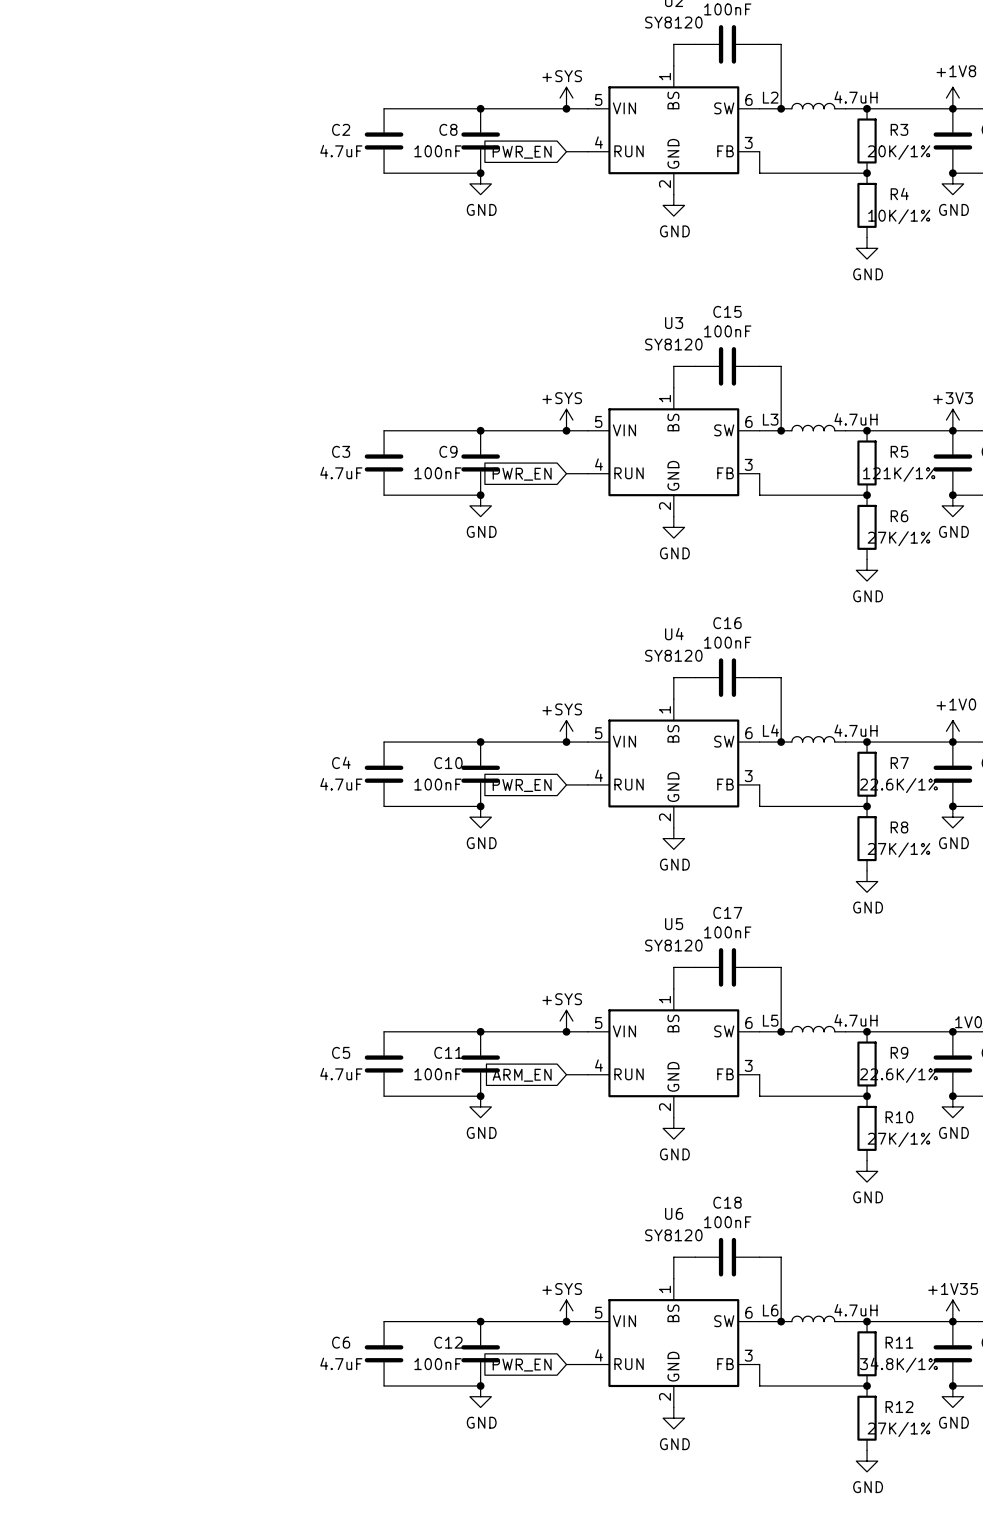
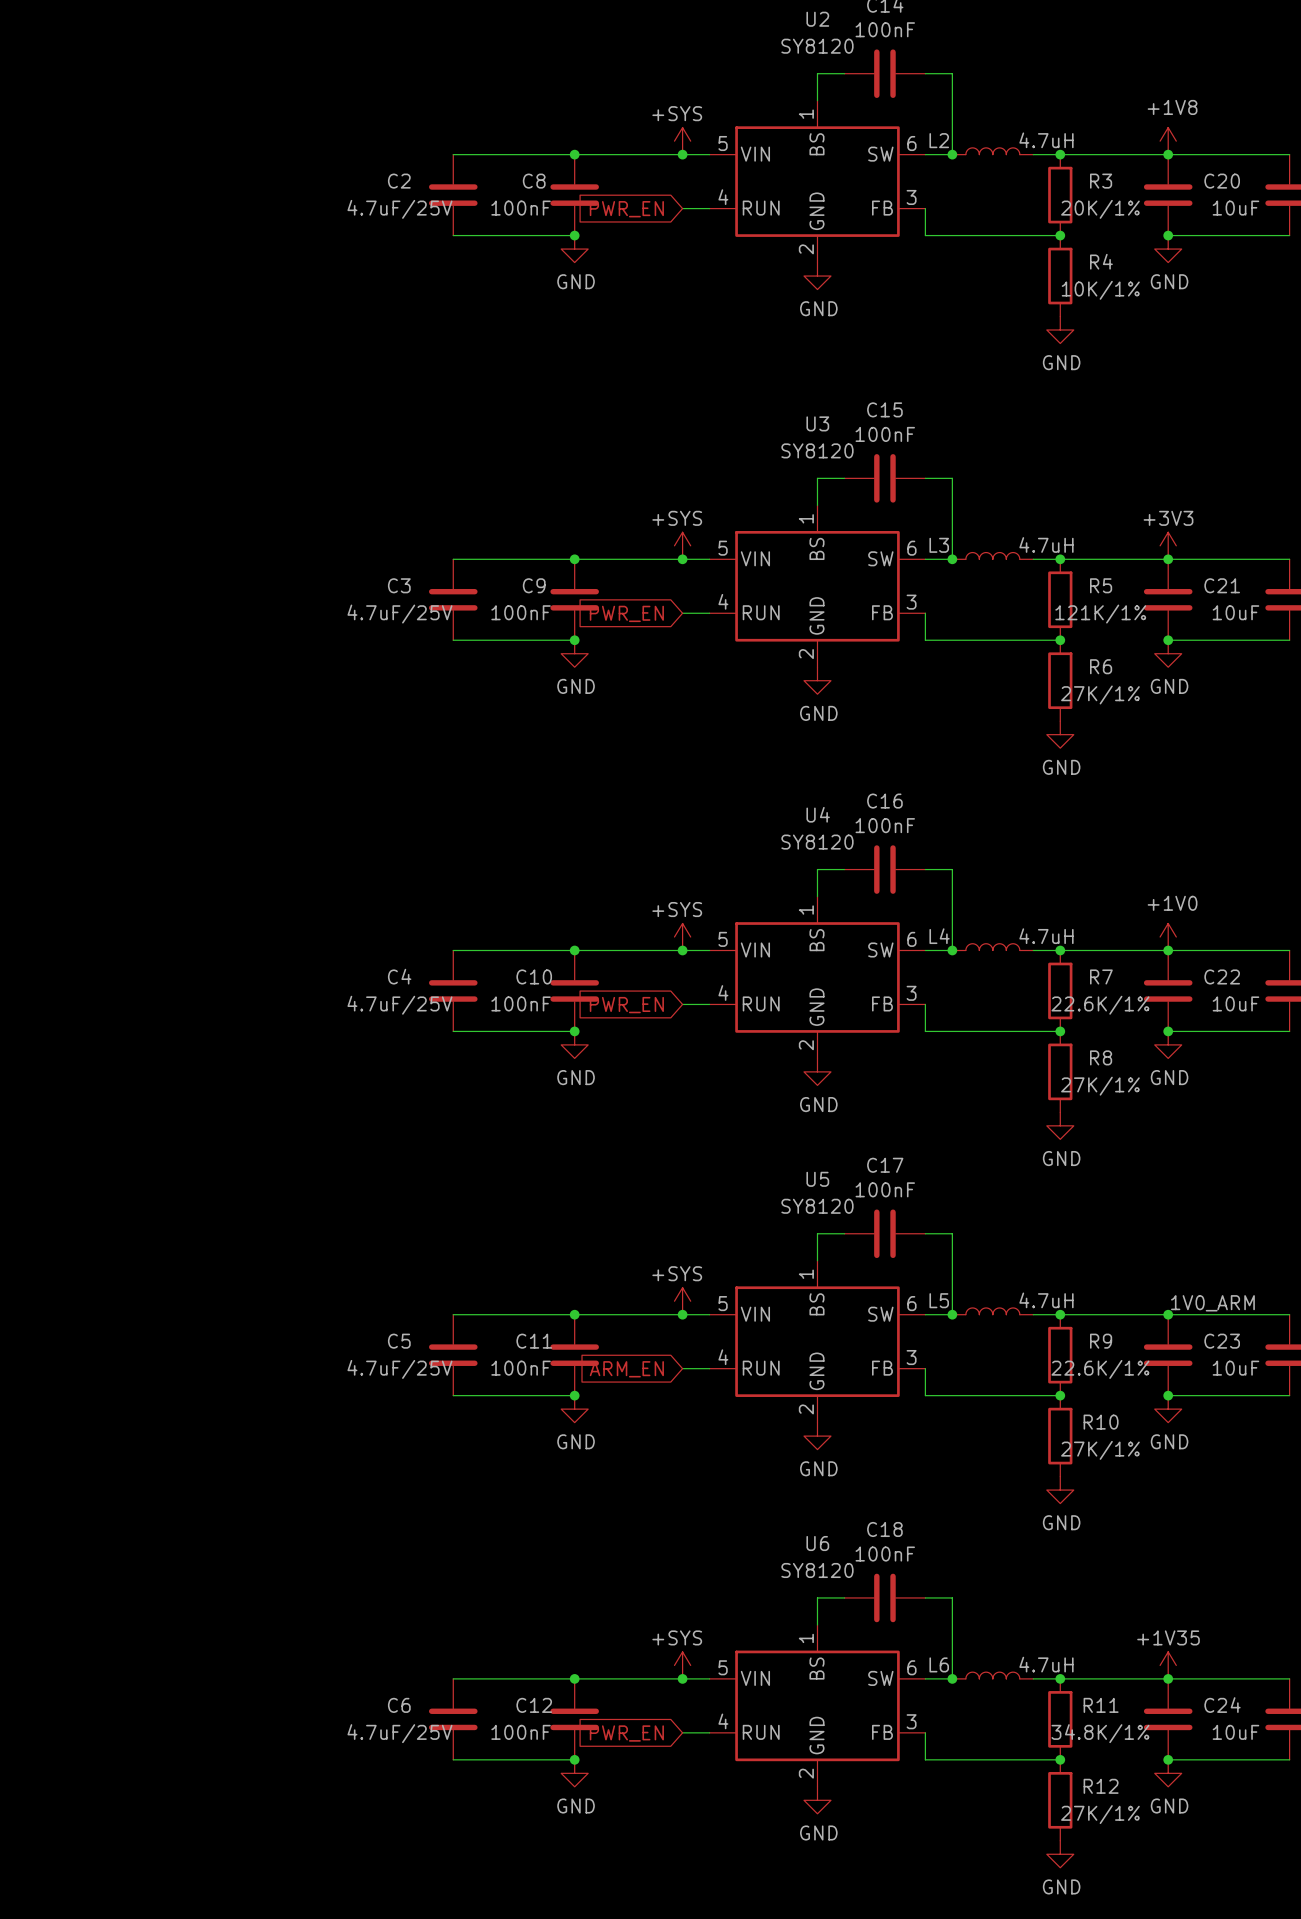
C2 value: 4.7uF (341, 151) -> 4.7uF/25V (399, 209)
C3 value: 4.7uF (341, 473) -> 4.7uF/25V (399, 614)
C4 value: 4.7uF (341, 784) -> 4.7uF/25V (399, 1005)
C5 value: 4.7uF (341, 1074) -> 4.7uF/25V (399, 1369)
C6 value: 4.7uF (341, 1363) -> 4.7uF/25V (399, 1733)

